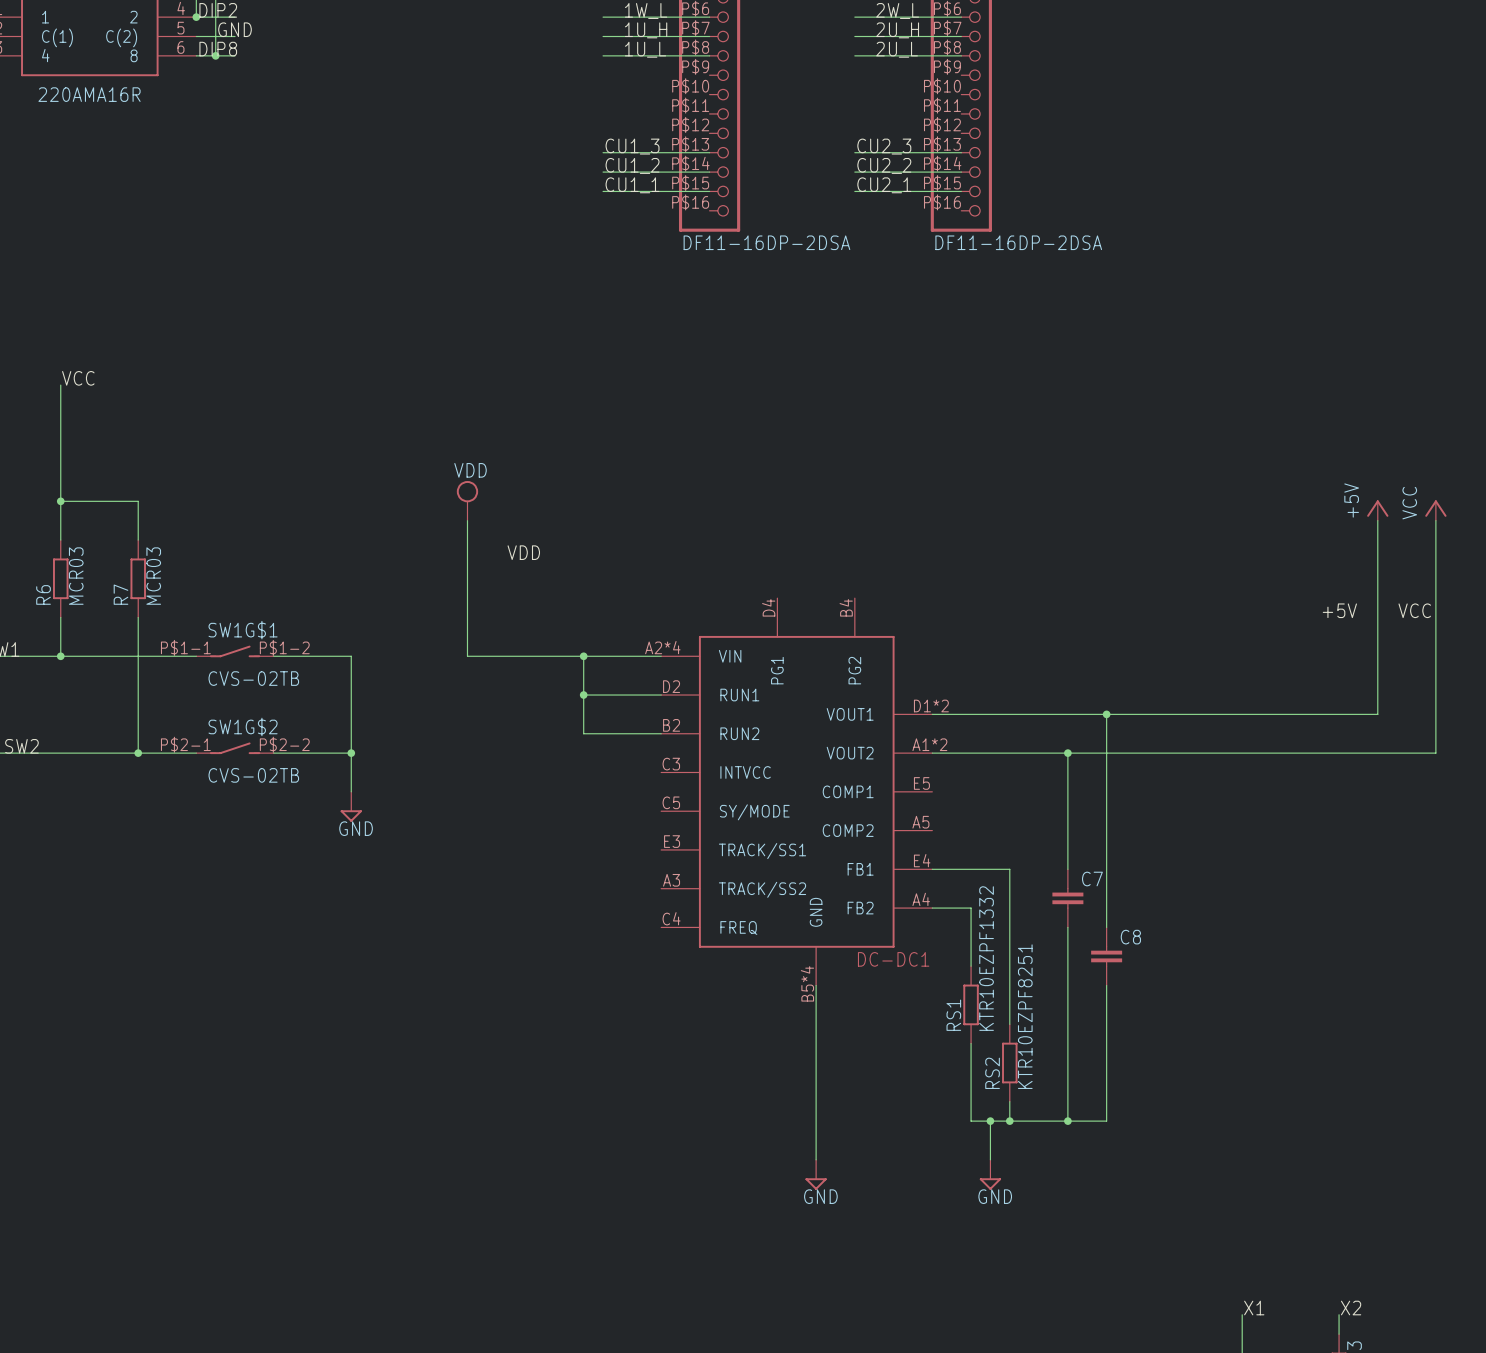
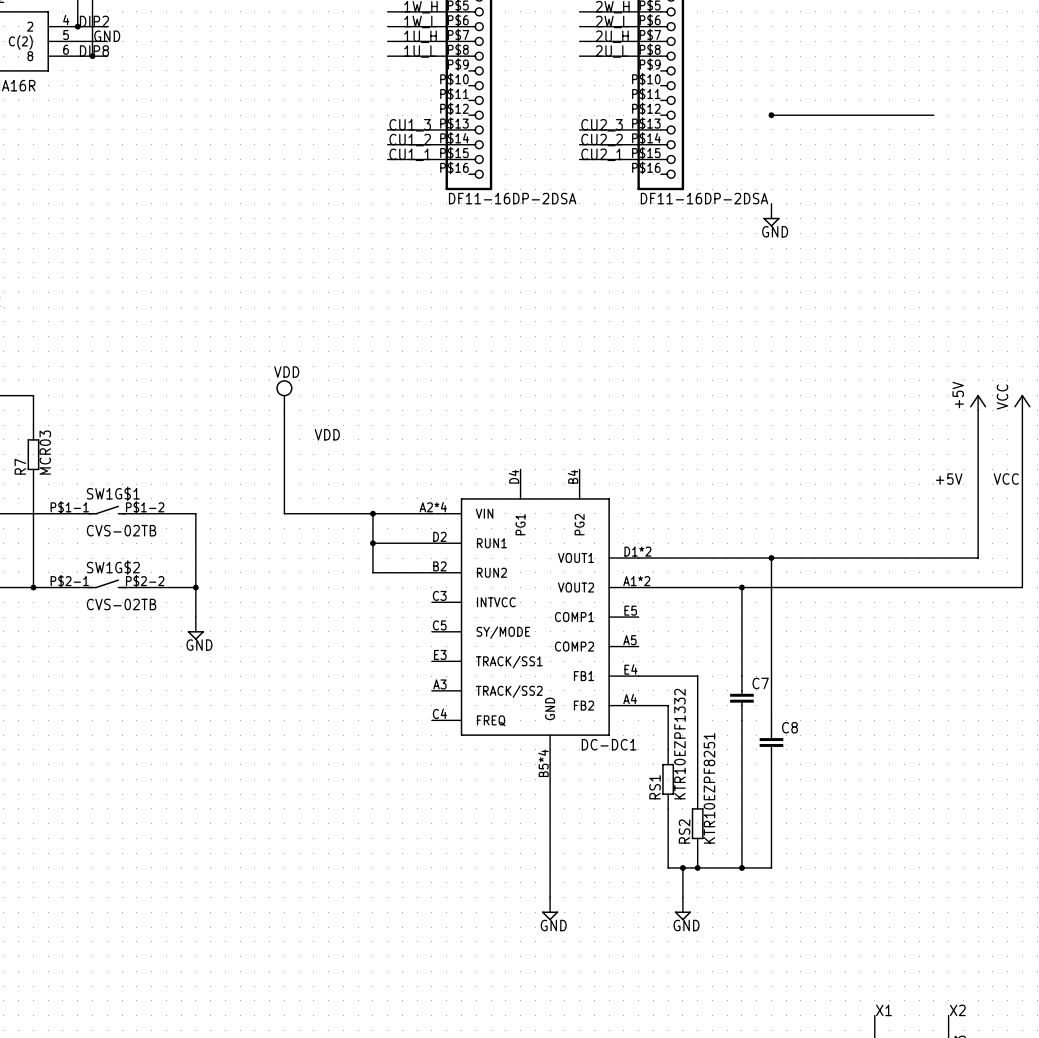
wire: none -> (771, 115) (933, 115)
junction: none -> (771, 115)
power symbol: none -> GND (771, 215)

